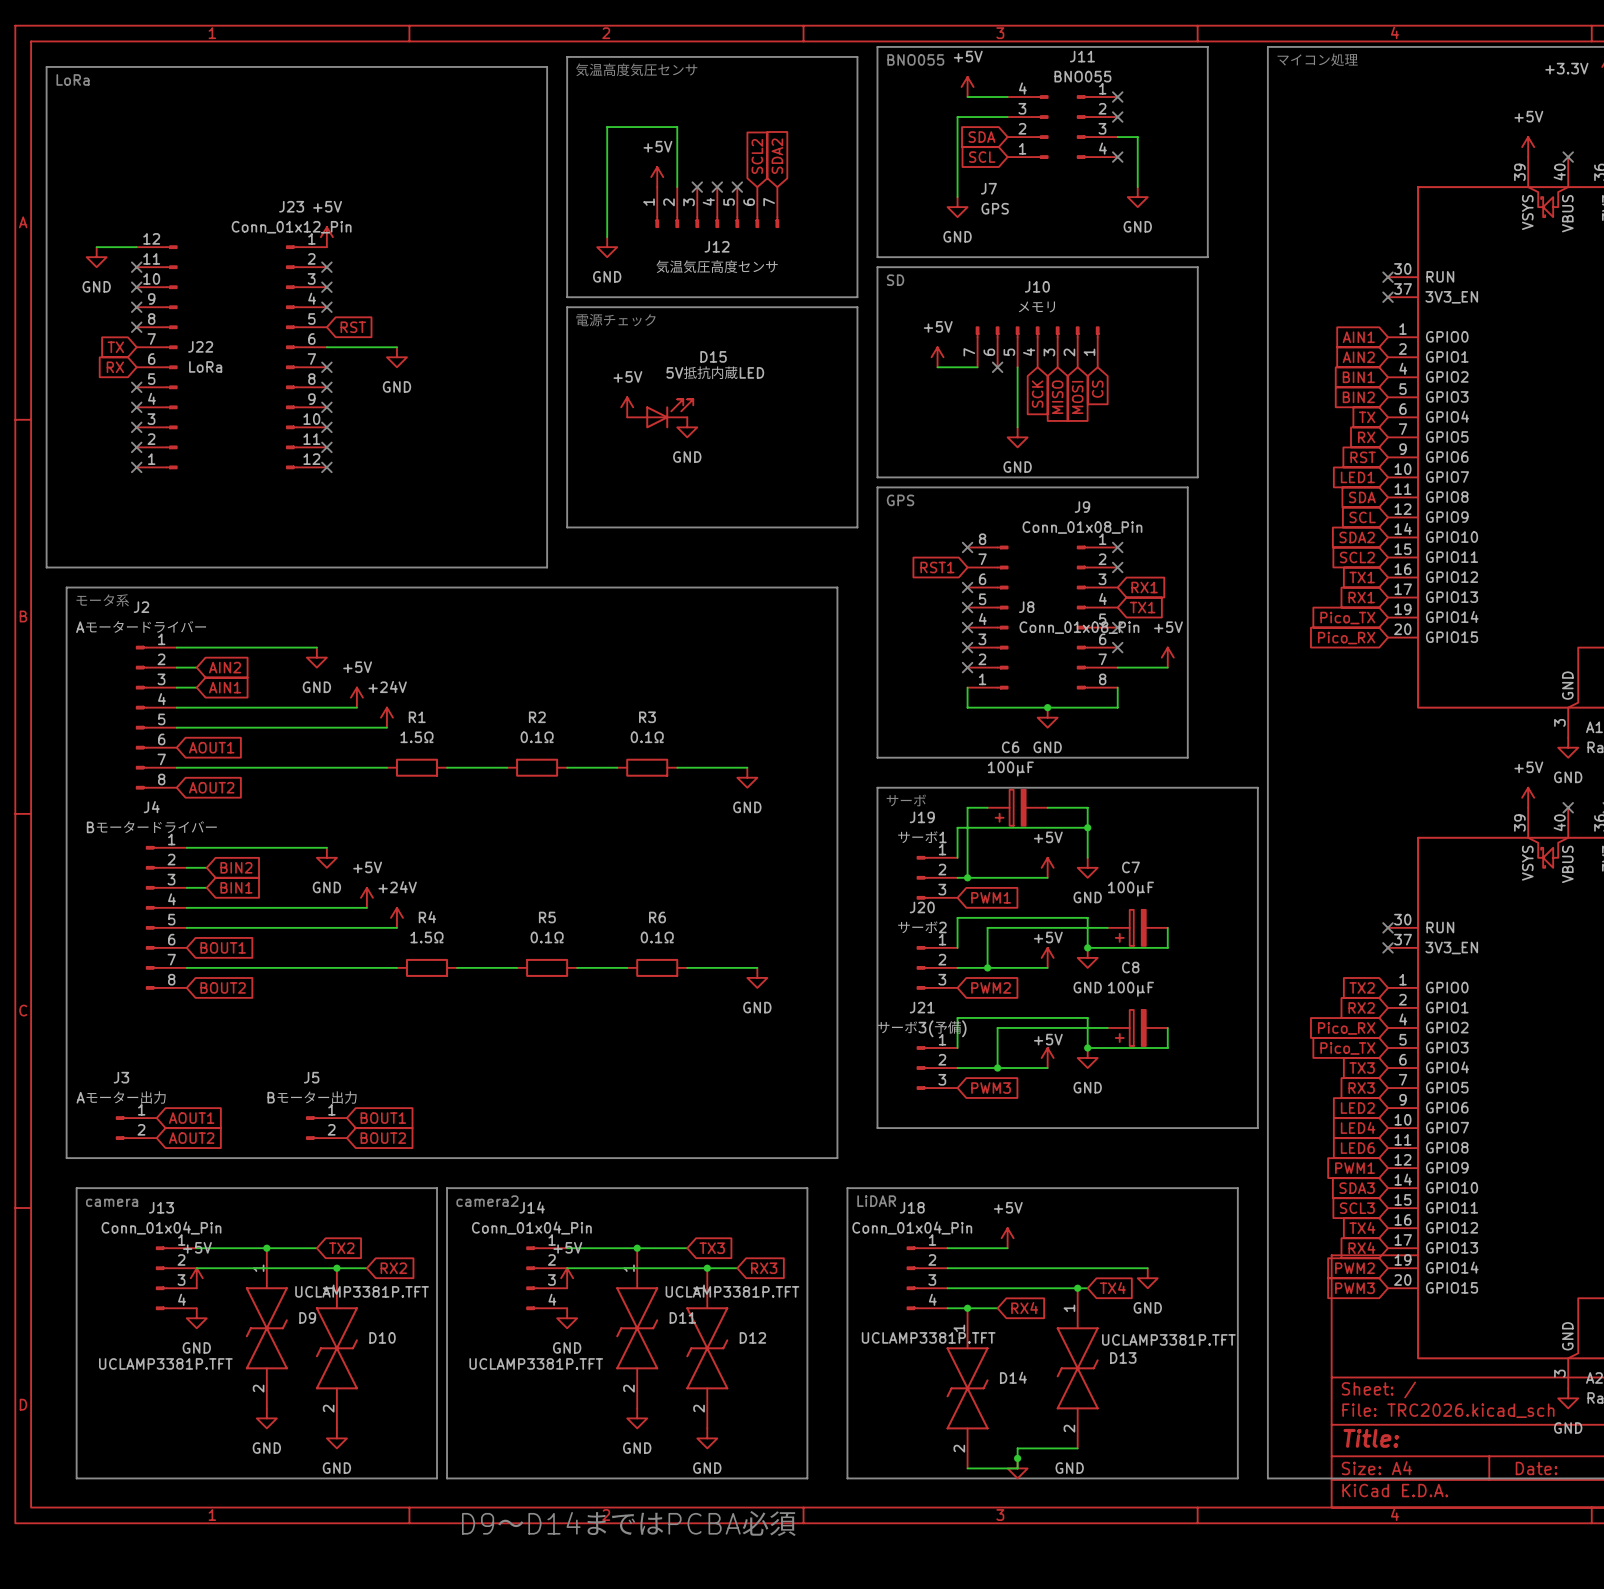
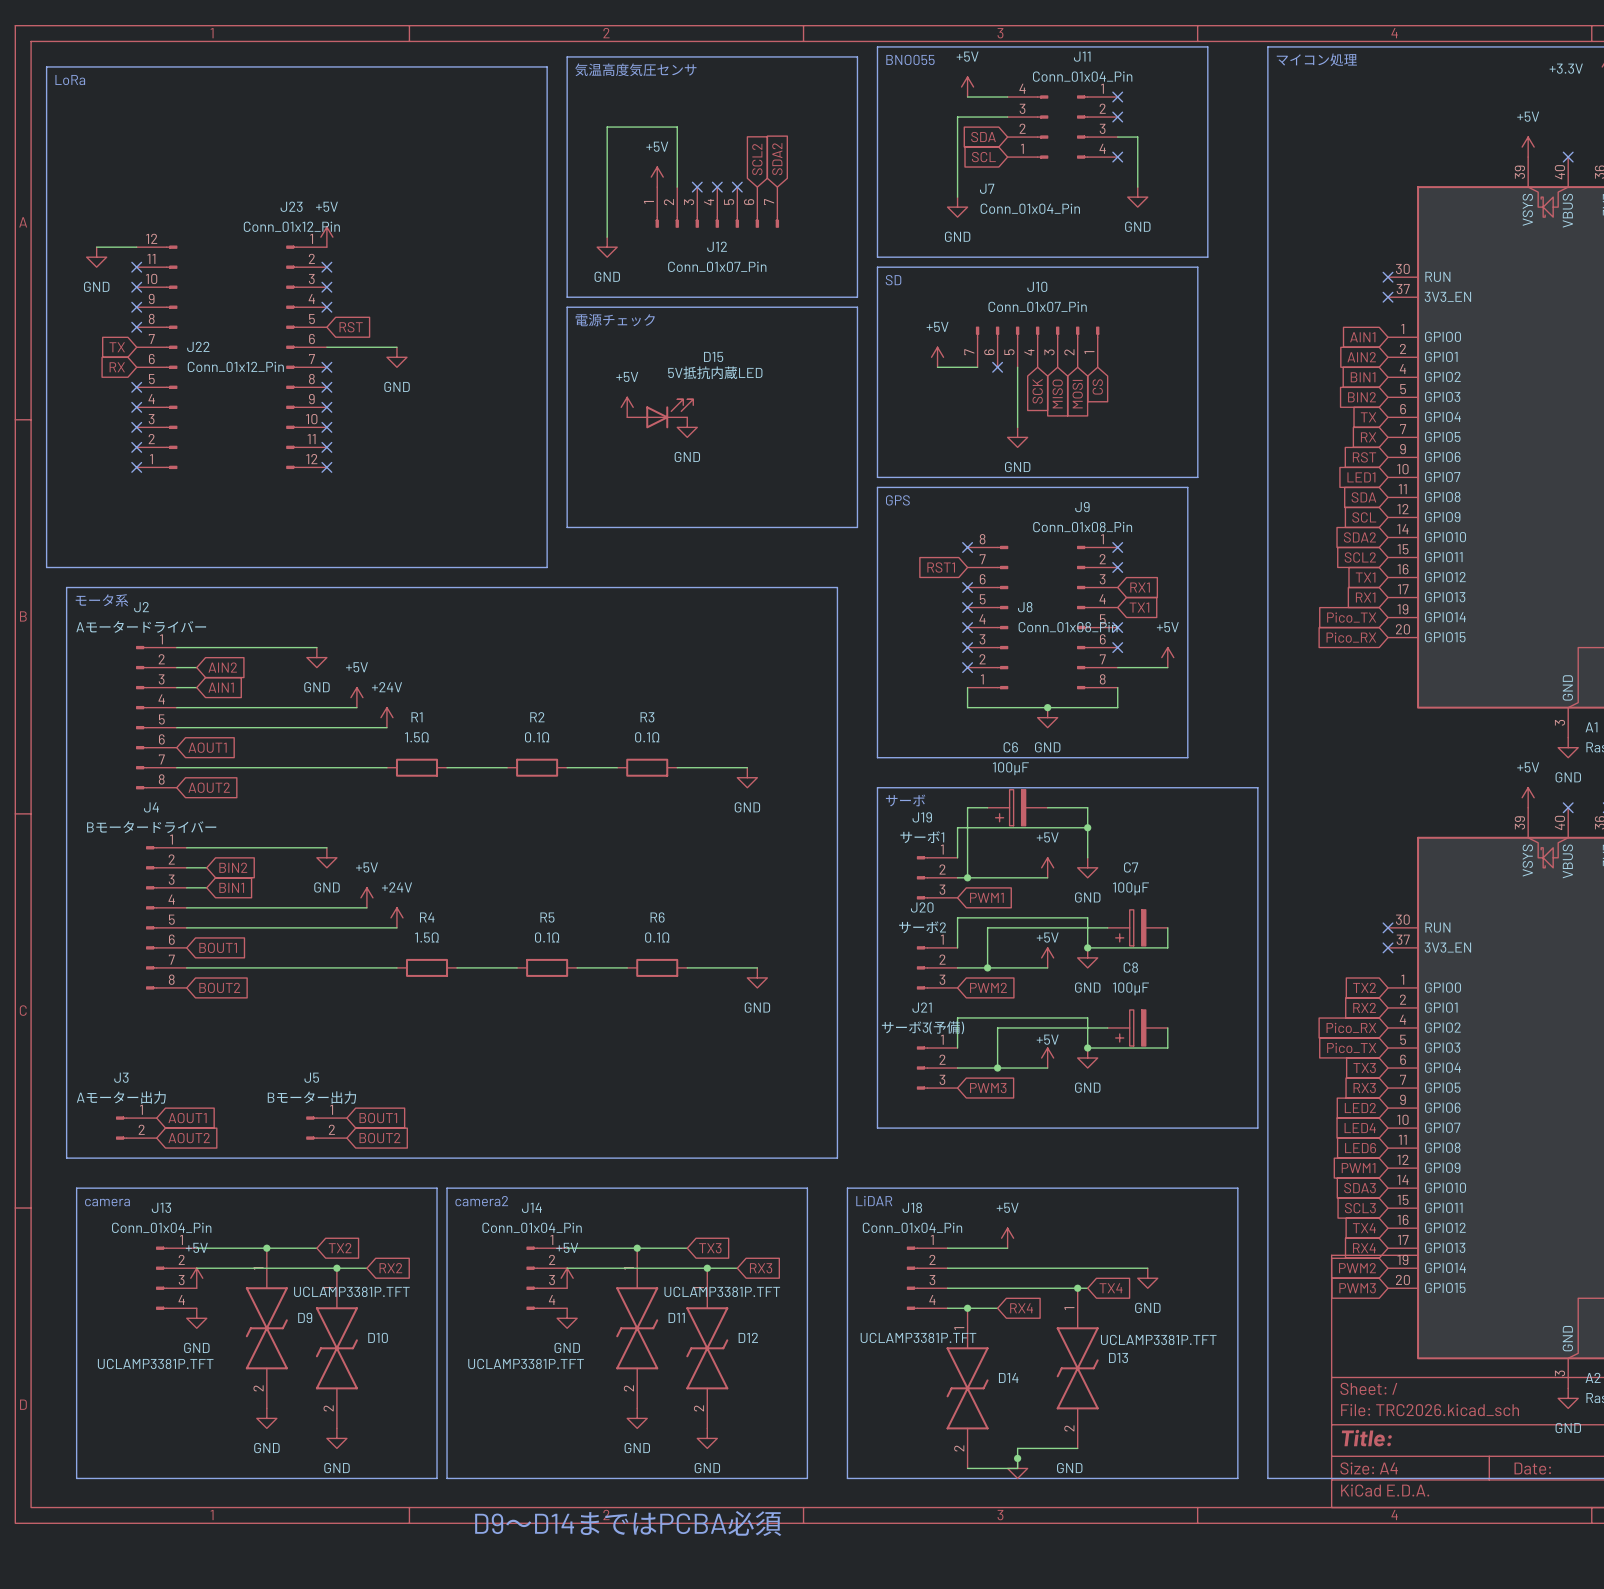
J11 value: BNO055 (1082, 76) -> Conn_01x04_Pin (1082, 76)
J7 value: GPS (995, 208) -> Conn_01x04_Pin (1030, 208)
J12 value: 気温気圧高度センサ (717, 266) -> Conn_01x07_Pin (717, 266)
J10 value: メモリ (1036, 306) -> Conn_01x07_Pin (1037, 306)
J22 value: LoRa (205, 366) -> Conn_01x12_Pin (235, 366)

